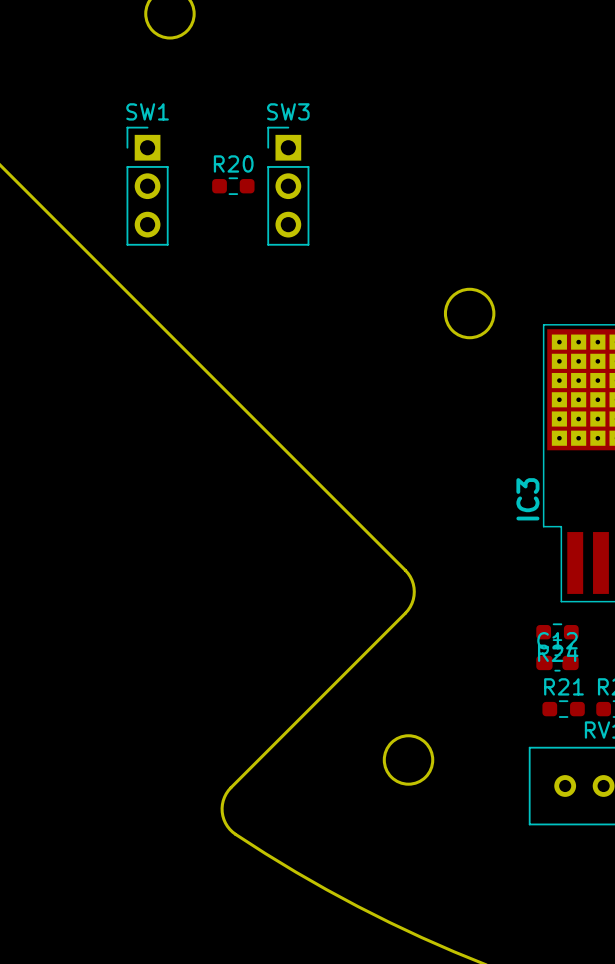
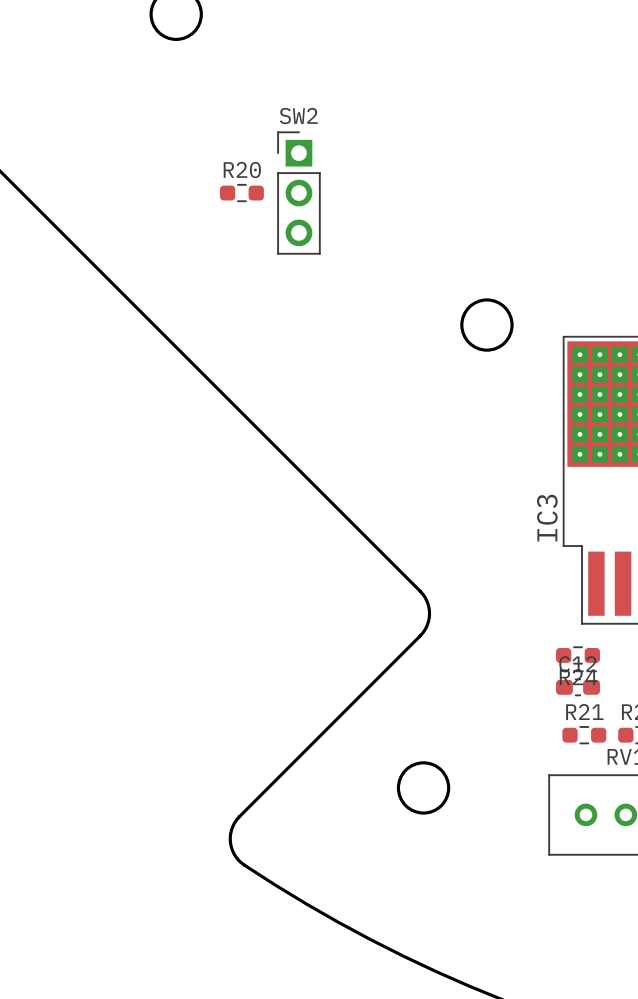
SW3 name: SW3 (288, 111) -> SW2 (298, 116)
SW1: (147, 186) -> none

